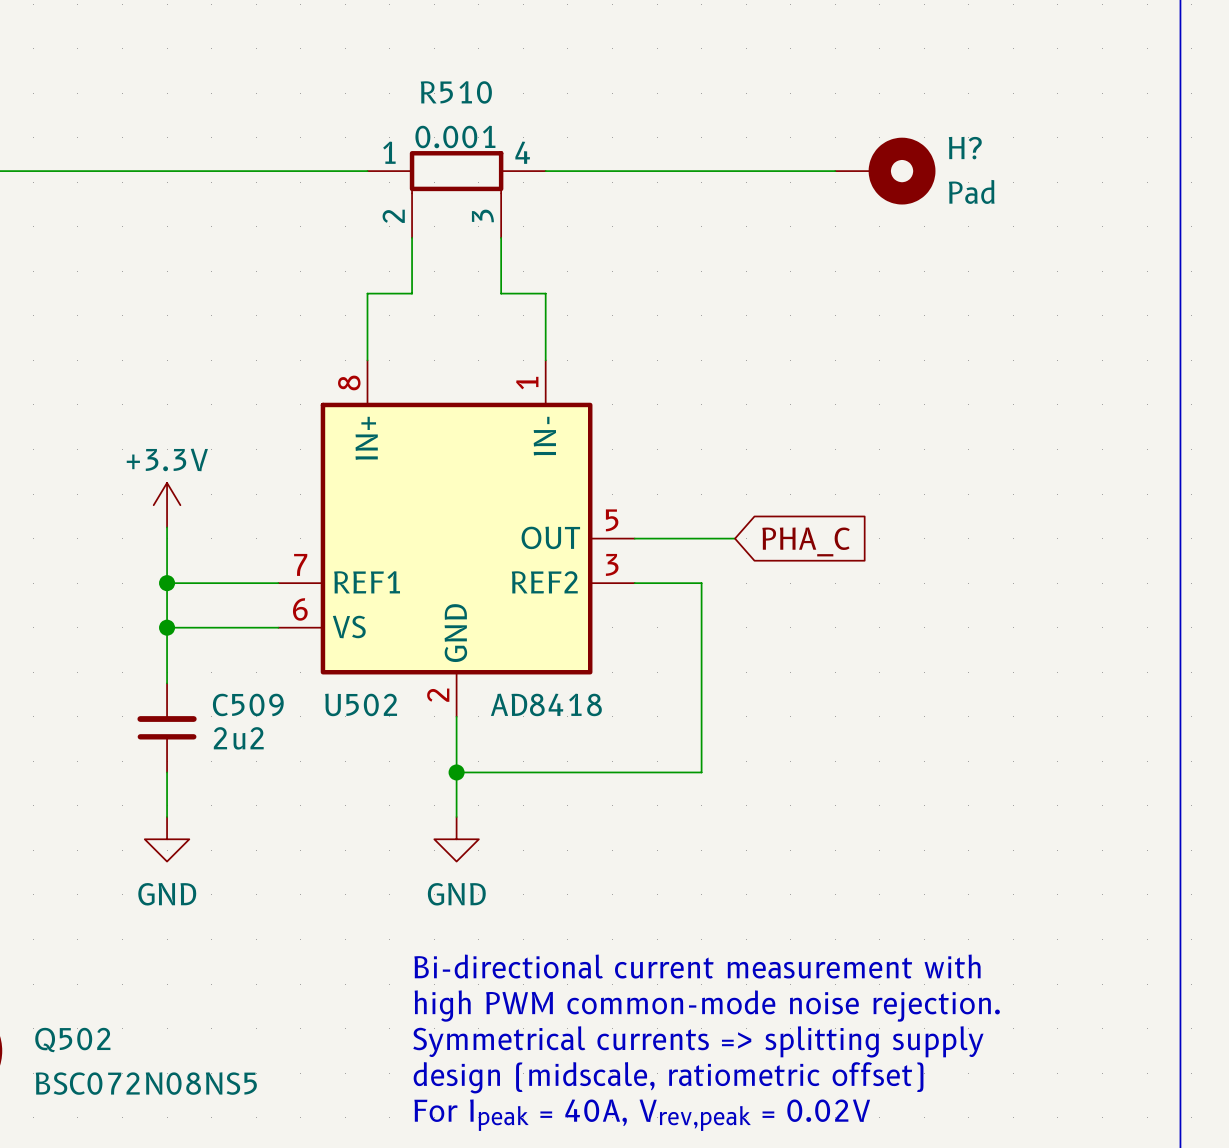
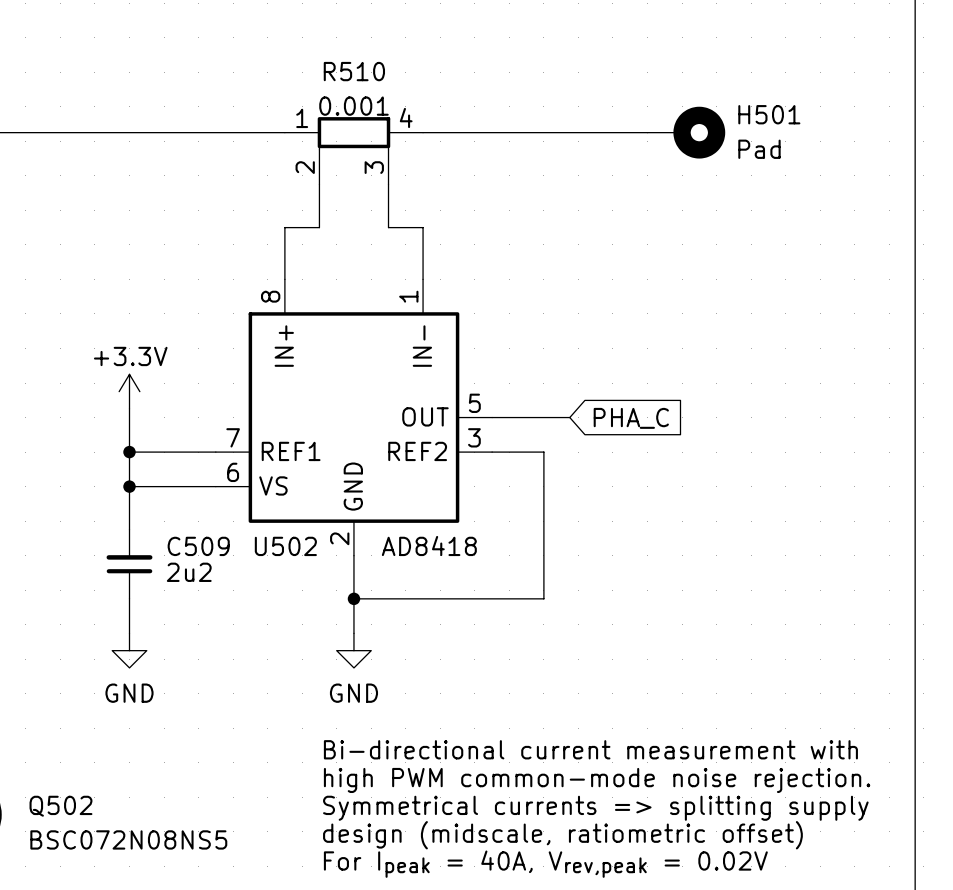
H? name: H? (965, 148) -> H501 (769, 114)

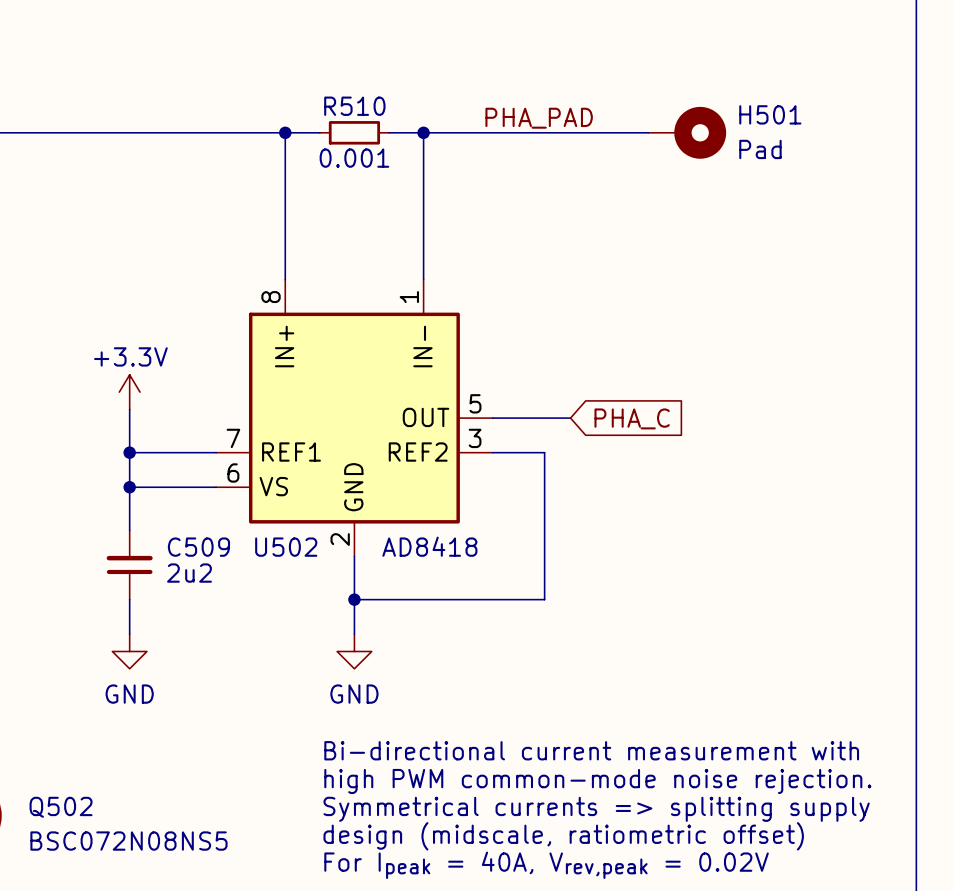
R510 name position: R510 (354, 71) -> R510 (354, 106)
R510 value position: 0.001 (353, 106) -> 0.001 (354, 158)
R510 symbol: [284, 117, 424, 185] -> [319, 121, 390, 145]
label: none -> PHA_PAD (539, 118)
junction: none -> (285, 132)
junction: none -> (423, 132)
wire: (319, 184) (319, 227) (284, 227) -> (319, 132) (285, 132) (285, 227)
wire: (388, 184) (388, 227) (423, 227) -> (389, 132) (423, 132) (423, 227)

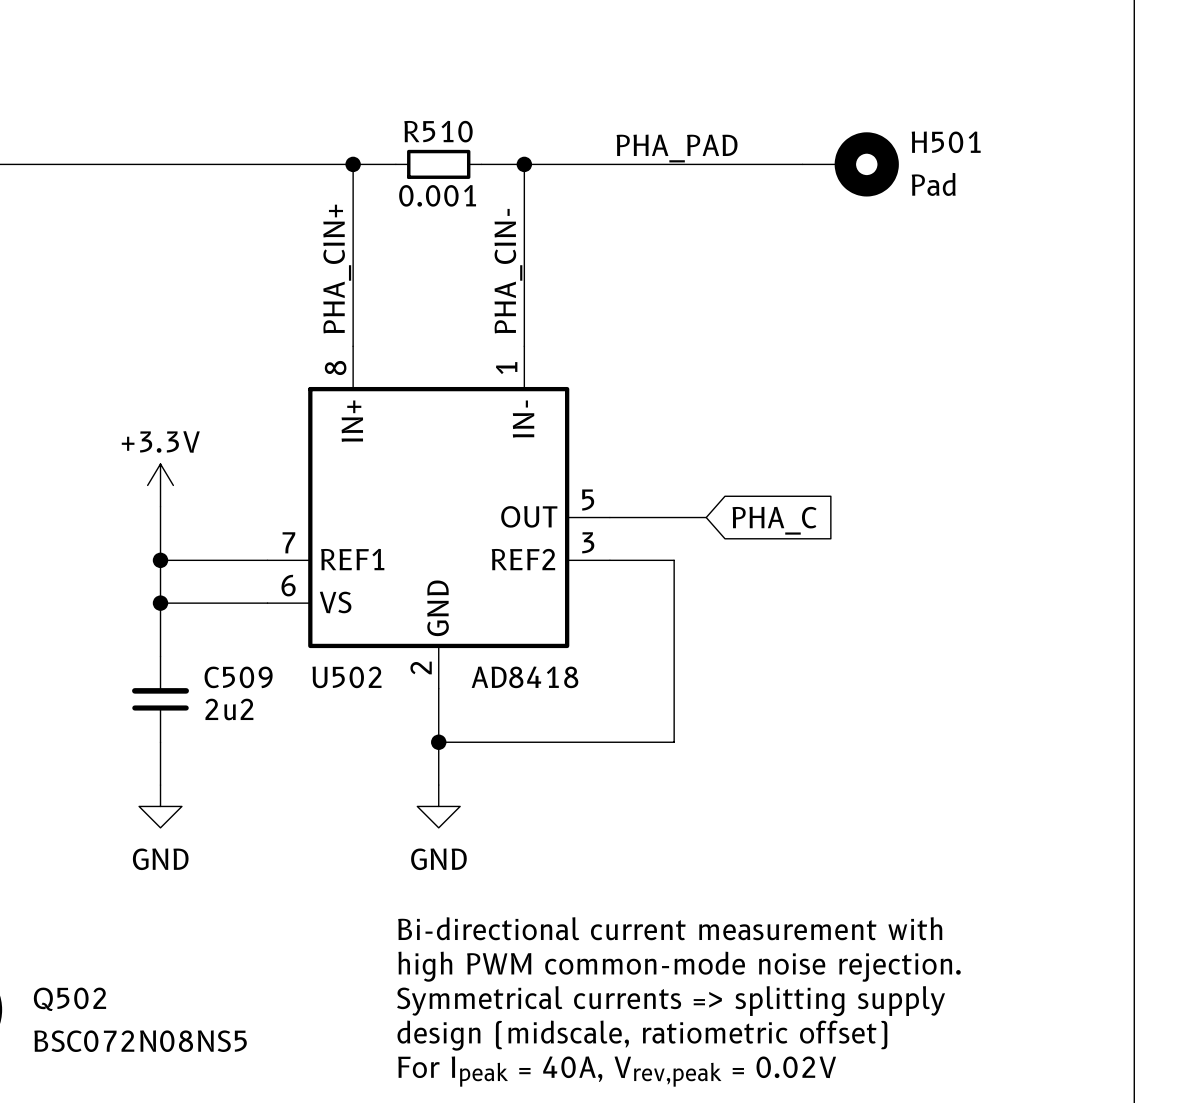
label: none -> PHA_CIN+ (337, 269)
label: none -> PHA_CIN- (508, 271)

